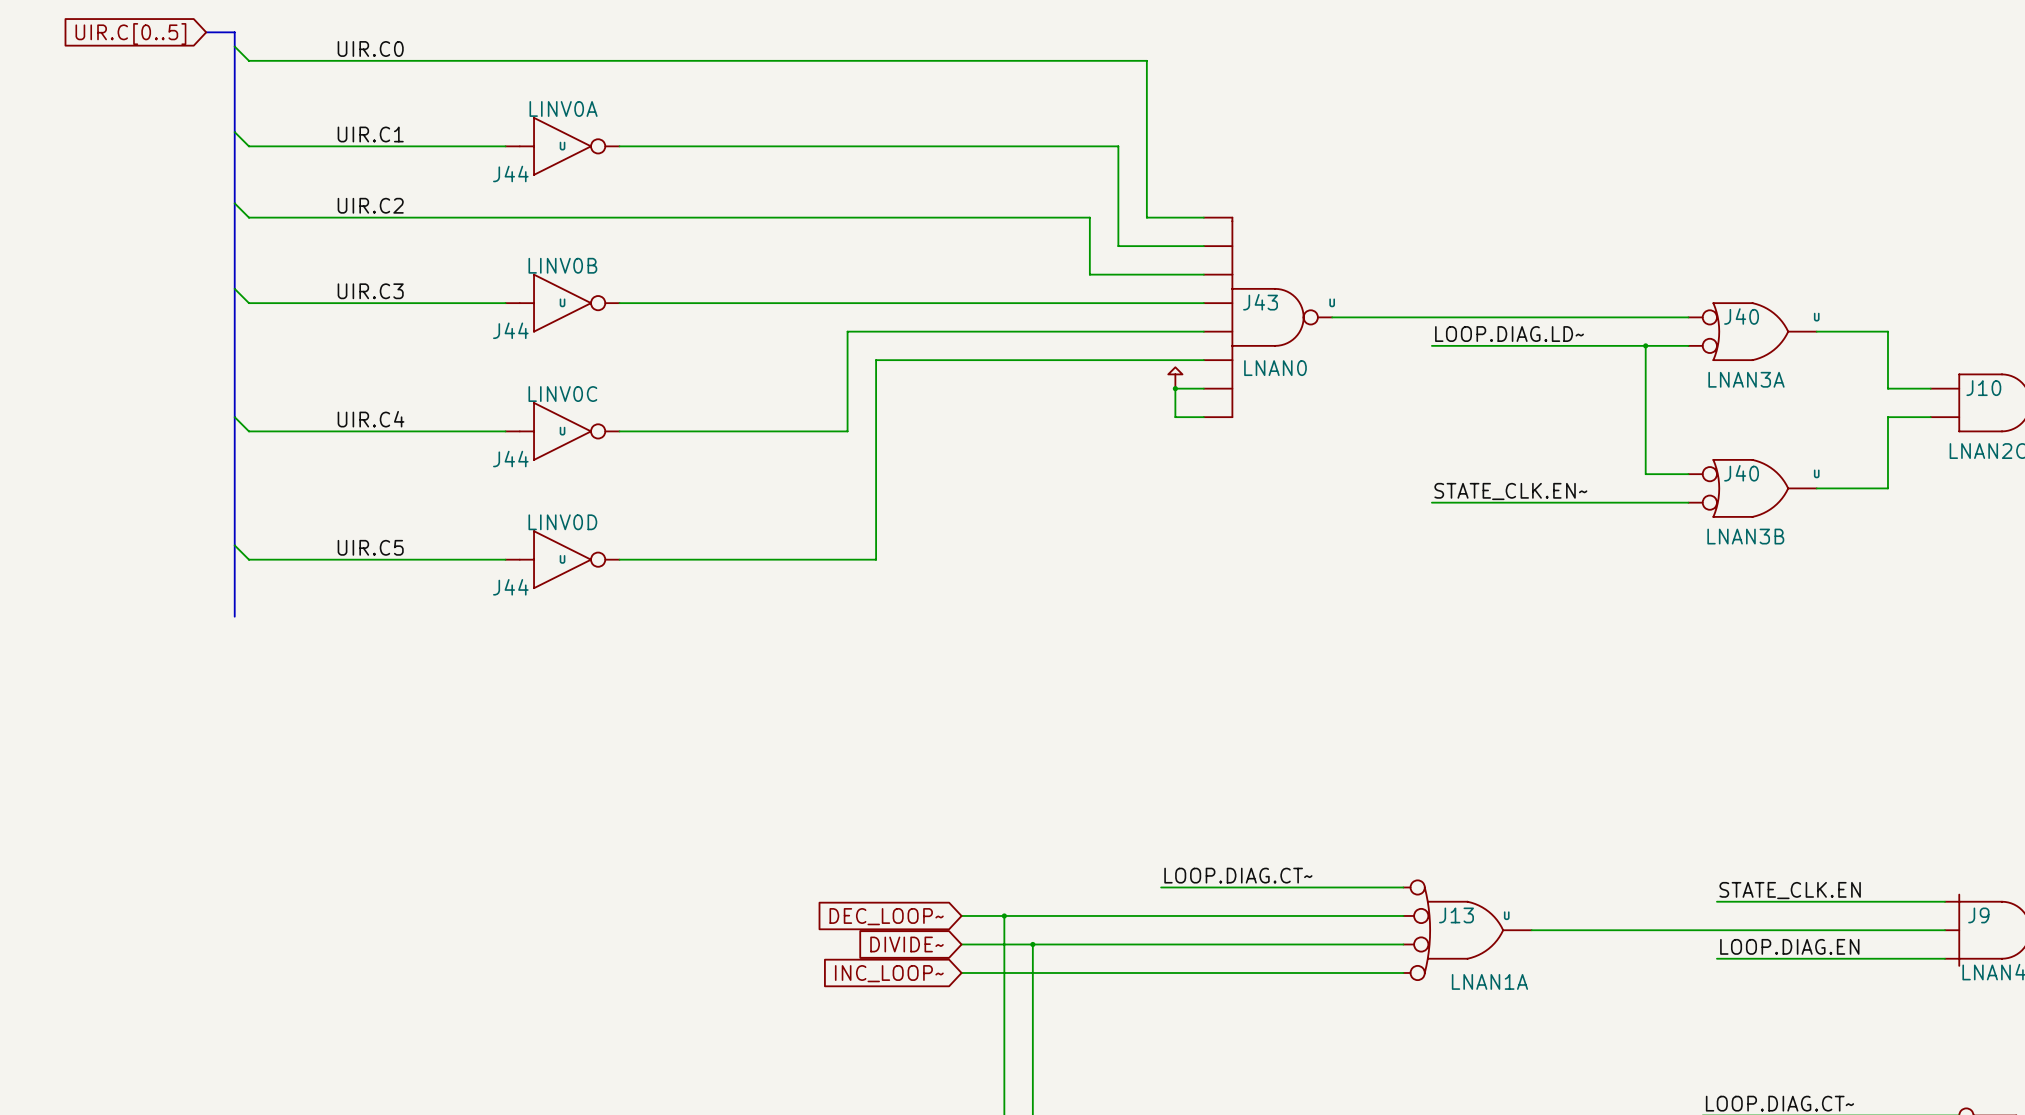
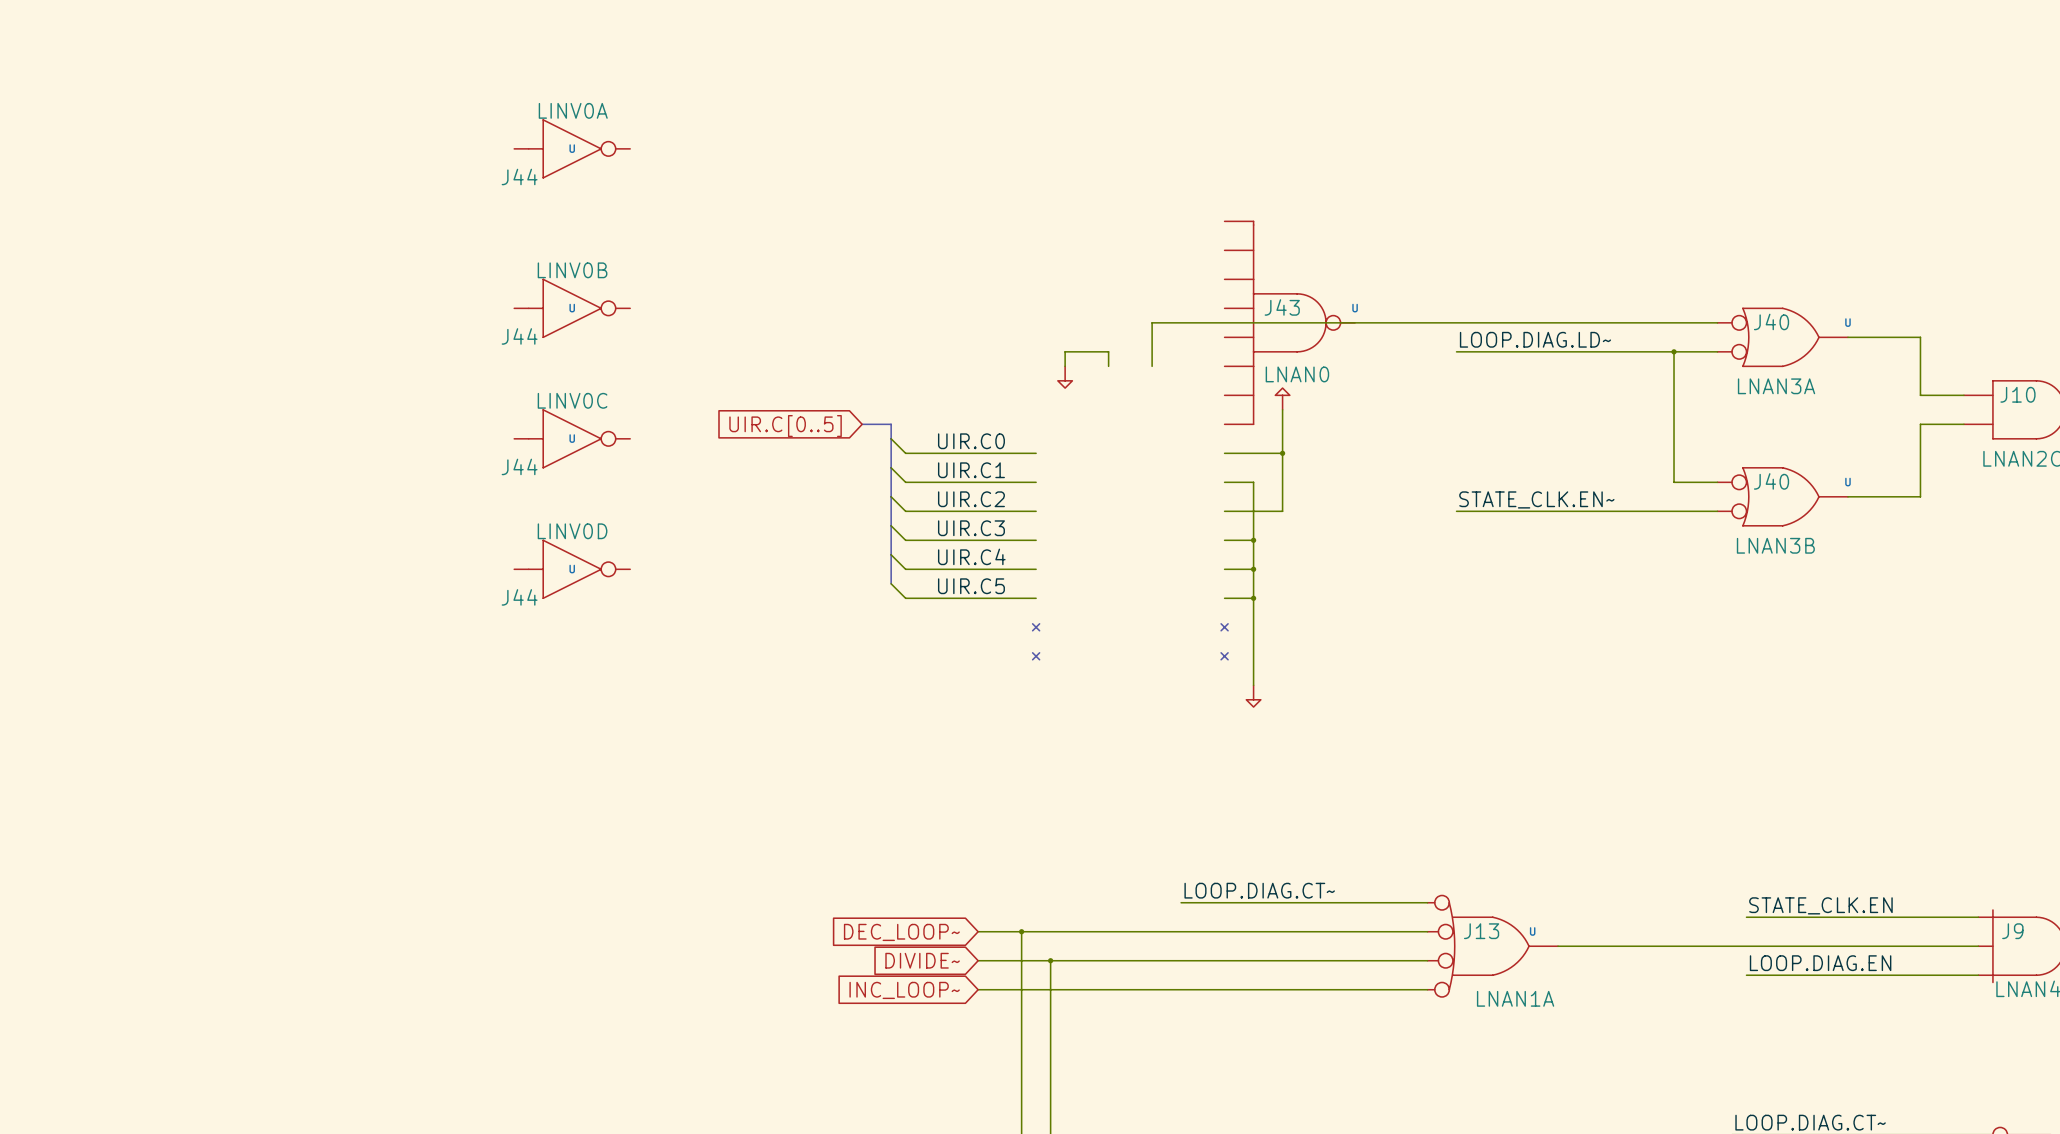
bus: (206, 32) (234, 32) (234, 616) -> none
global label: UIR.C[0..5] (130, 34) -> none
wire: (234, 46) (248, 60) (1146, 60) (1146, 217) (1203, 217) -> none
label: UIR.C0 (370, 48) -> none
wire: (234, 132) (248, 146) (505, 146) -> none
label: UIR.C1 (370, 134) -> none
wire: (619, 146) (1118, 146) (1118, 246) (1203, 246) -> none
wire: (234, 203) (248, 217) (1089, 217) (1089, 274) (1203, 274) -> none
label: UIR.C2 (370, 205) -> none
wire: (234, 288) (248, 303) (505, 303) -> none
label: UIR.C3 (370, 291) -> none
wire: (619, 303) (1203, 303) -> none
wire: none -> (1355, 322) (1152, 322) (1152, 366)
wire: (1203, 331) (847, 331) (847, 431) (619, 431) -> none
wire: none -> (1065, 366) (1065, 351) (1108, 351) (1108, 366)
wire: (1203, 360) (876, 360) (876, 559) (619, 559) -> none
power symbol: none -> (1065, 377)
power symbol: (1175, 377) -> none
junction: (1175, 388) -> none
wire: (1203, 388) (1175, 388) (1175, 417) (1203, 417) -> none
power symbol: none -> (1282, 398)
wire: none -> (1282, 409) (1282, 511) (1224, 511)
wire: (234, 417) (248, 431) (505, 431) -> none
bus: none -> (862, 424) (891, 424) (891, 583)
global label: none -> UIR.C[0..5] (785, 426)
label: UIR.C4 (371, 419) -> none
wire: none -> (891, 438) (905, 453) (1036, 453)
label: none -> UIR.C0 (971, 441)
wire: none -> (1224, 453) (1282, 453)
junction: none -> (1282, 453)
wire: none -> (891, 467) (905, 482) (1036, 482)
label: none -> UIR.C1 (971, 470)
wire: none -> (1224, 482) (1253, 482) (1253, 685)
wire: none -> (891, 496) (905, 511) (1036, 511)
label: none -> UIR.C2 (971, 499)
wire: none -> (891, 525) (905, 540) (1036, 540)
label: none -> UIR.C3 (971, 528)
wire: none -> (1224, 540) (1253, 540)
junction: none -> (1253, 540)
wire: (234, 545) (248, 559) (505, 559) -> none
wire: none -> (891, 554) (905, 569) (1036, 569)
label: UIR.C5 (370, 547) -> none
label: none -> UIR.C4 (971, 556)
wire: none -> (1224, 569) (1253, 569)
junction: none -> (1253, 569)
wire: none -> (891, 583) (905, 598) (1036, 598)
label: none -> UIR.C5 (971, 586)
wire: none -> (1224, 598) (1253, 598)
junction: none -> (1253, 598)
no-connect mark: none -> (1036, 627)
no-connect mark: none -> (1224, 627)
no-connect mark: none -> (1036, 656)
no-connect mark: none -> (1224, 656)
power symbol: none -> (1253, 696)

